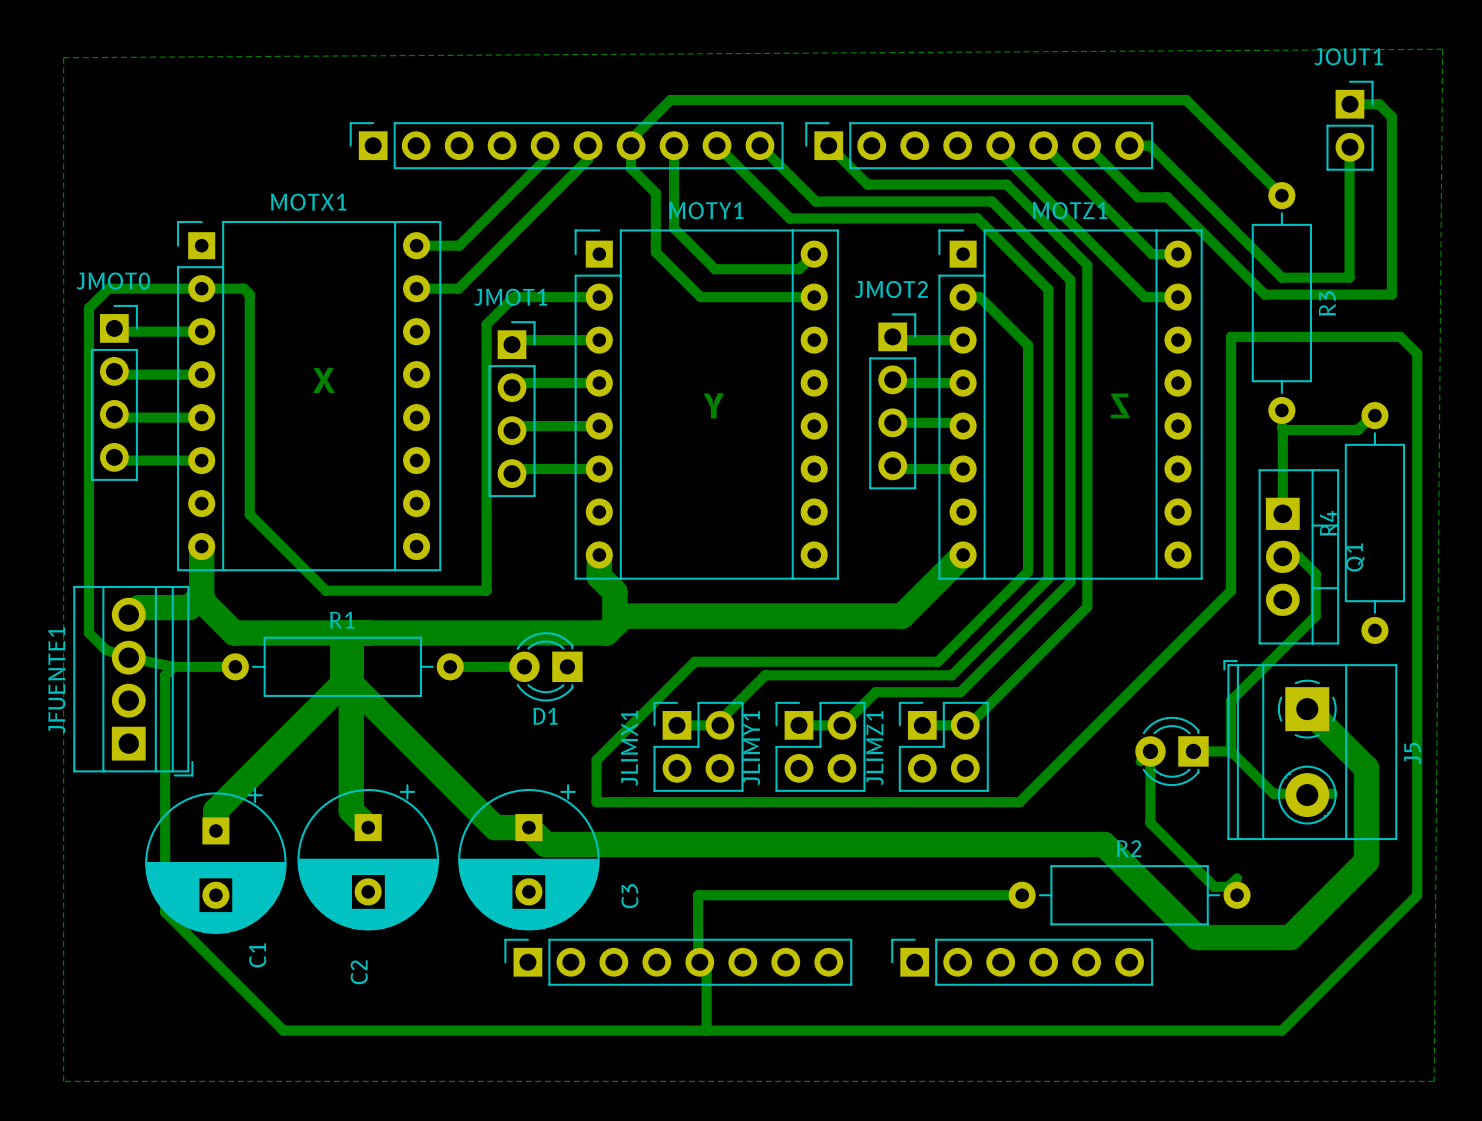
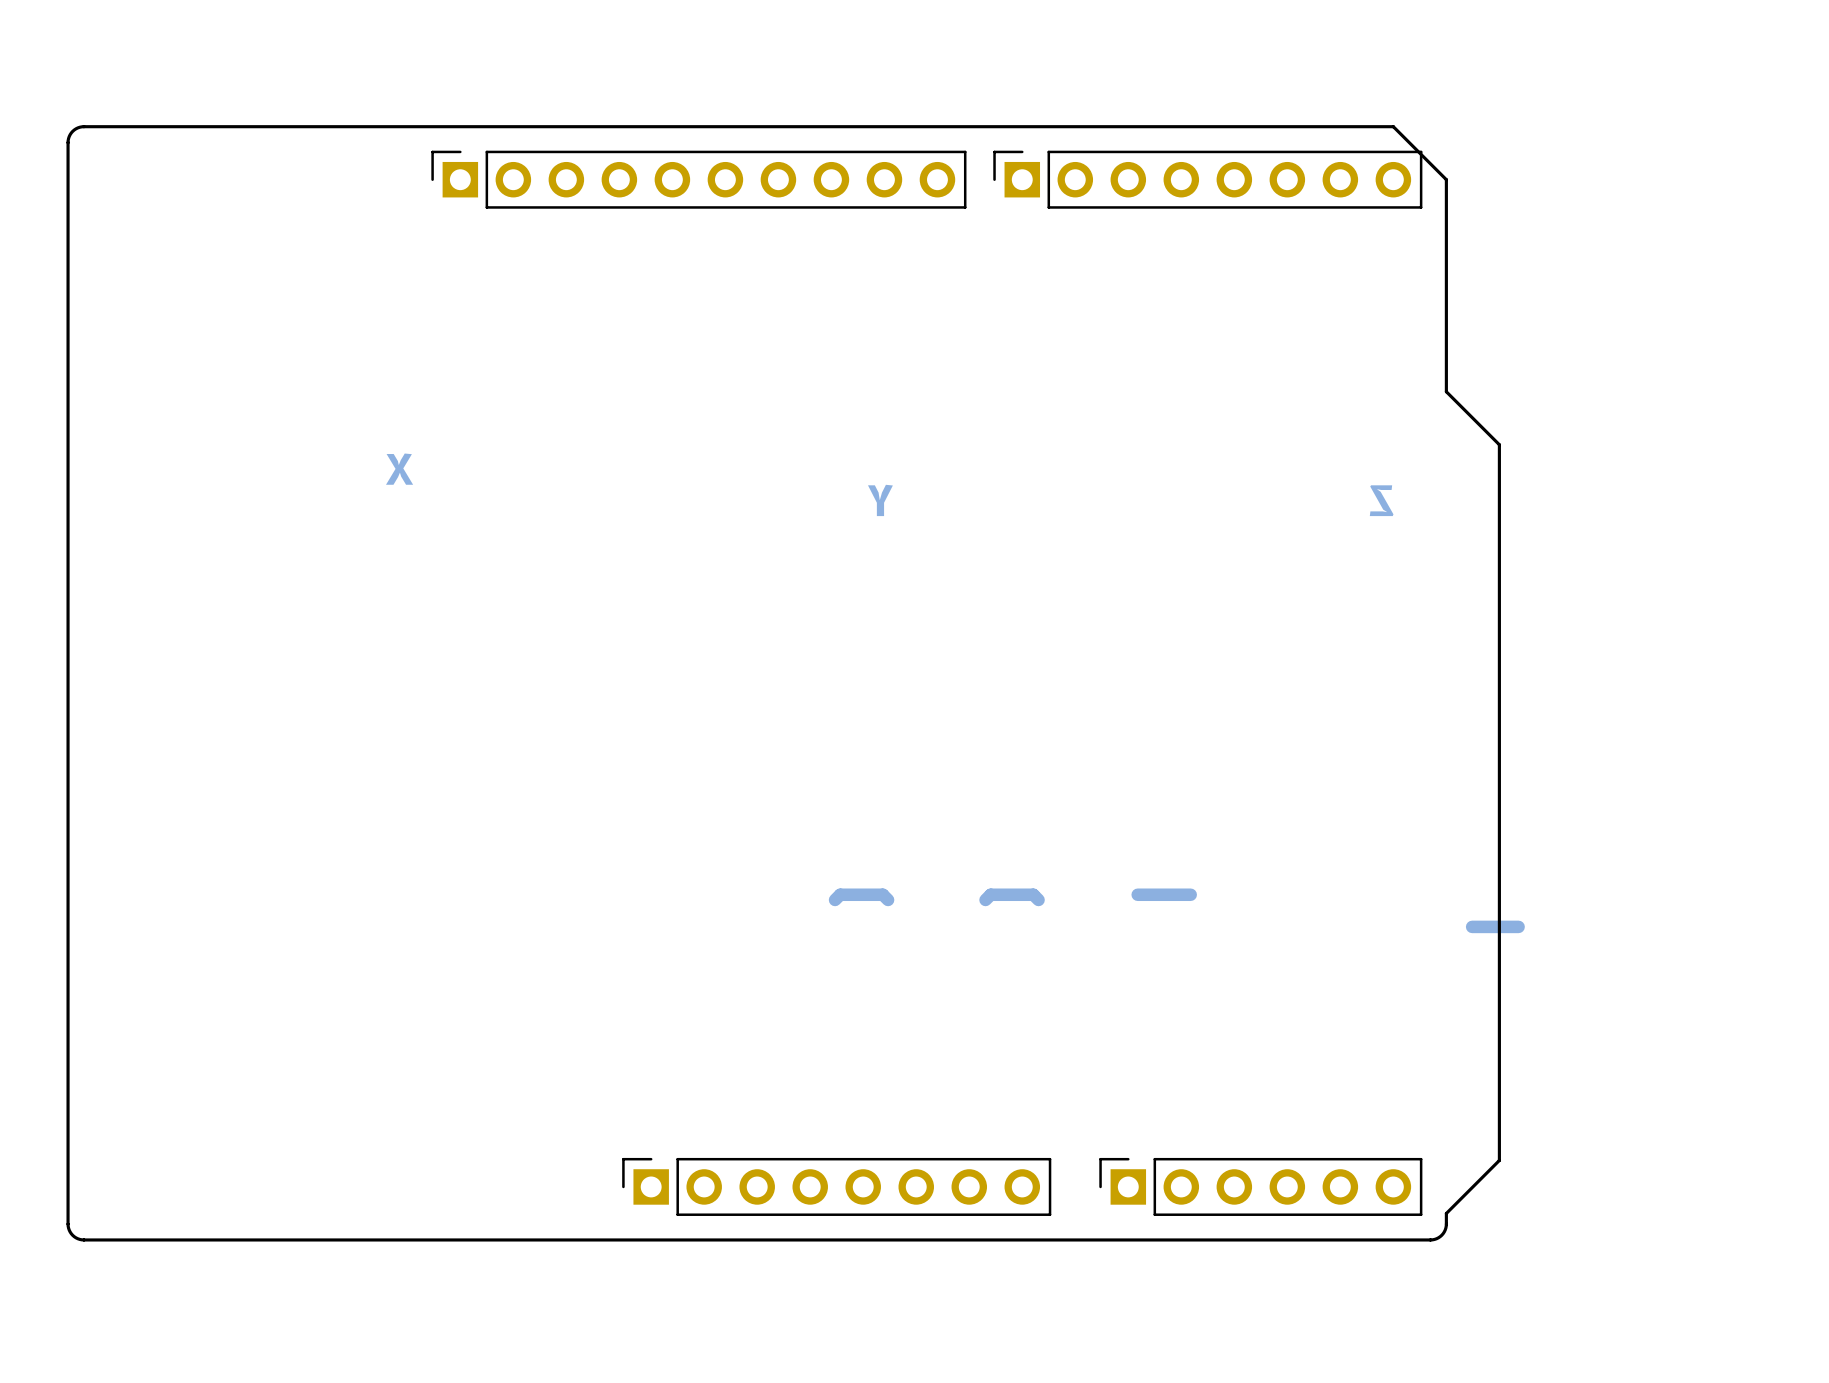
bottom zone outline: (1442, 49) (63, 57) (63, 1081) (1434, 1081) (1442, 49) -> none
board edge: none -> (83, 126) (1393, 126) (1446, 179) (1446, 391) (1499, 444) (1499, 1160) (1446, 1213) (1446, 1226) (1443, 1233) (1438, 1237) (1430, 1239) (83, 1239) (74, 1236) (70, 1232) (68, 1224) (68, 142) (72, 131) (83, 126)
bottom track: (1349, 104) (1379, 104) (1391, 116) (1391, 294) (1264, 294) (1167, 197) (1138, 197) (1086, 145) -> none
JOUT1: (1349, 125) -> none
bottom track: (545, 145) (545, 159) (459, 245) (416, 245) -> none
bottom track: (588, 145) (588, 159) (458, 288) (416, 288) -> none
bottom track: (674, 145) (674, 228) (715, 269) (799, 269) (814, 254) -> none
bottom track: (717, 145) (789, 218) (977, 218) (1048, 289) (1048, 578) (951, 675) (765, 675) (715, 725) -> none
bottom track: (759, 145) (815, 201) (992, 201) (1070, 279) (1070, 582) (960, 692) (875, 692) (841, 726) -> none
bottom track: (828, 145) (867, 184) (1006, 184) (1087, 264) (1087, 606) (968, 725) -> none
bottom track: (1000, 145) (1000, 152) (1144, 297) (1177, 297) -> none
bottom track: (1043, 145) (1152, 254) (1177, 254) -> none
bottom track: (1129, 145) (1149, 145) (1281, 277) (1349, 277) (1349, 147) -> none
bottom track: (1281, 195) (1186, 100) (670, 100) (631, 139) (631, 168) (655, 193) (655, 252) (700, 297) (814, 297) -> none
bottom track: (599, 297) (513, 297) (486, 324) (486, 590) (325, 590) (249, 514) (249, 294) (243, 288) (108, 288) (89, 308) (89, 632) (105, 649) (128, 657) (173, 666) -> none
bottom track: (963, 297) (979, 297) (1028, 345) (1028, 571) (937, 661) (694, 661) (596, 759) (596, 802) (1019, 802) (1231, 590) (1231, 336) (1400, 336) (1417, 353) (1417, 895) (1281, 1030) (283, 1030) (165, 912) (165, 675) (173, 666) -> none
R3: (1281, 303) -> none
bottom track: (114, 328) (117, 331) (201, 331) -> none
bottom track: (892, 336) (895, 340) (963, 340) -> none
bottom track: (599, 340) (516, 340) (512, 344) -> none
bottom track: (114, 371) (117, 374) (201, 374) -> none
bottom track: (892, 379) (895, 383) (963, 383) -> none
bottom track: (599, 383) (516, 383) (512, 387) -> none
JMOT0: (114, 392) -> none
MOTX1: (309, 396) -> none
JMOT2: (892, 401) -> none
MOTY1: (706, 404) -> none
MOTZ1: (1070, 404) -> none
JMOT1: (512, 409) -> none
bottom track: (114, 414) (117, 417) (201, 417) -> none
bottom track: (1372, 415) (1358, 429) (1284, 429) (1281, 427) -> none
bottom track: (892, 422) (959, 422) (963, 426) -> none
bottom track: (599, 426) (516, 426) (512, 430) -> none
bottom track: (1282, 428) (1282, 513) -> none
bottom track: (114, 457) (117, 460) (201, 460) -> none
bottom track: (892, 465) (895, 469) (963, 469) -> none
bottom track: (599, 469) (516, 469) (512, 473) -> none
R4: (1374, 523) -> none
bottom track: (201, 546) (201, 595) (189, 607) (138, 607) -> none
bottom track: (599, 554) (599, 576) (614, 592) (614, 624) -> none
bottom track: (963, 554) (902, 616) (623, 616) (606, 632) (234, 632) (198, 597) -> none
bottom track: (1282, 556) (1298, 556) (1315, 573) (1315, 616) (1231, 700) (1231, 751) (1273, 793) (1332, 793) -> none
Q1: (1298, 556) -> none
bottom track: (173, 666) (235, 666) -> none
R1: (342, 666) -> none
bottom track: (450, 666) (524, 666) -> none
D1: (545, 666) -> none
JFUENTE1: (133, 681) -> none
bottom track: (351, 683) (495, 827) (528, 827) (545, 844) (1104, 844) (1197, 937) (1290, 937) (1366, 861) (1366, 768) (1307, 709) (1315, 700) -> none
JLIMX1: (698, 746) -> none
JLIMY1: (820, 746) -> none
JLIMZ1: (943, 746) -> none
J5: (1310, 750) -> none
part: (1171, 751) -> none
bottom track: (1140, 761) (1150, 751) (1150, 823) (1214, 886) (1228, 886) (1237, 878) -> none
bottom track: (368, 827) (351, 810) (351, 641) (342, 632) (342, 683) (215, 810) (215, 830) -> none
C2: (368, 857) -> none
C3: (528, 857) -> none
C1: (215, 860) -> none
bottom track: (1022, 895) (698, 895) (698, 960) (699, 962) -> none
R2: (1129, 895) -> none
bottom track: (706, 969) (706, 1030) -> none

